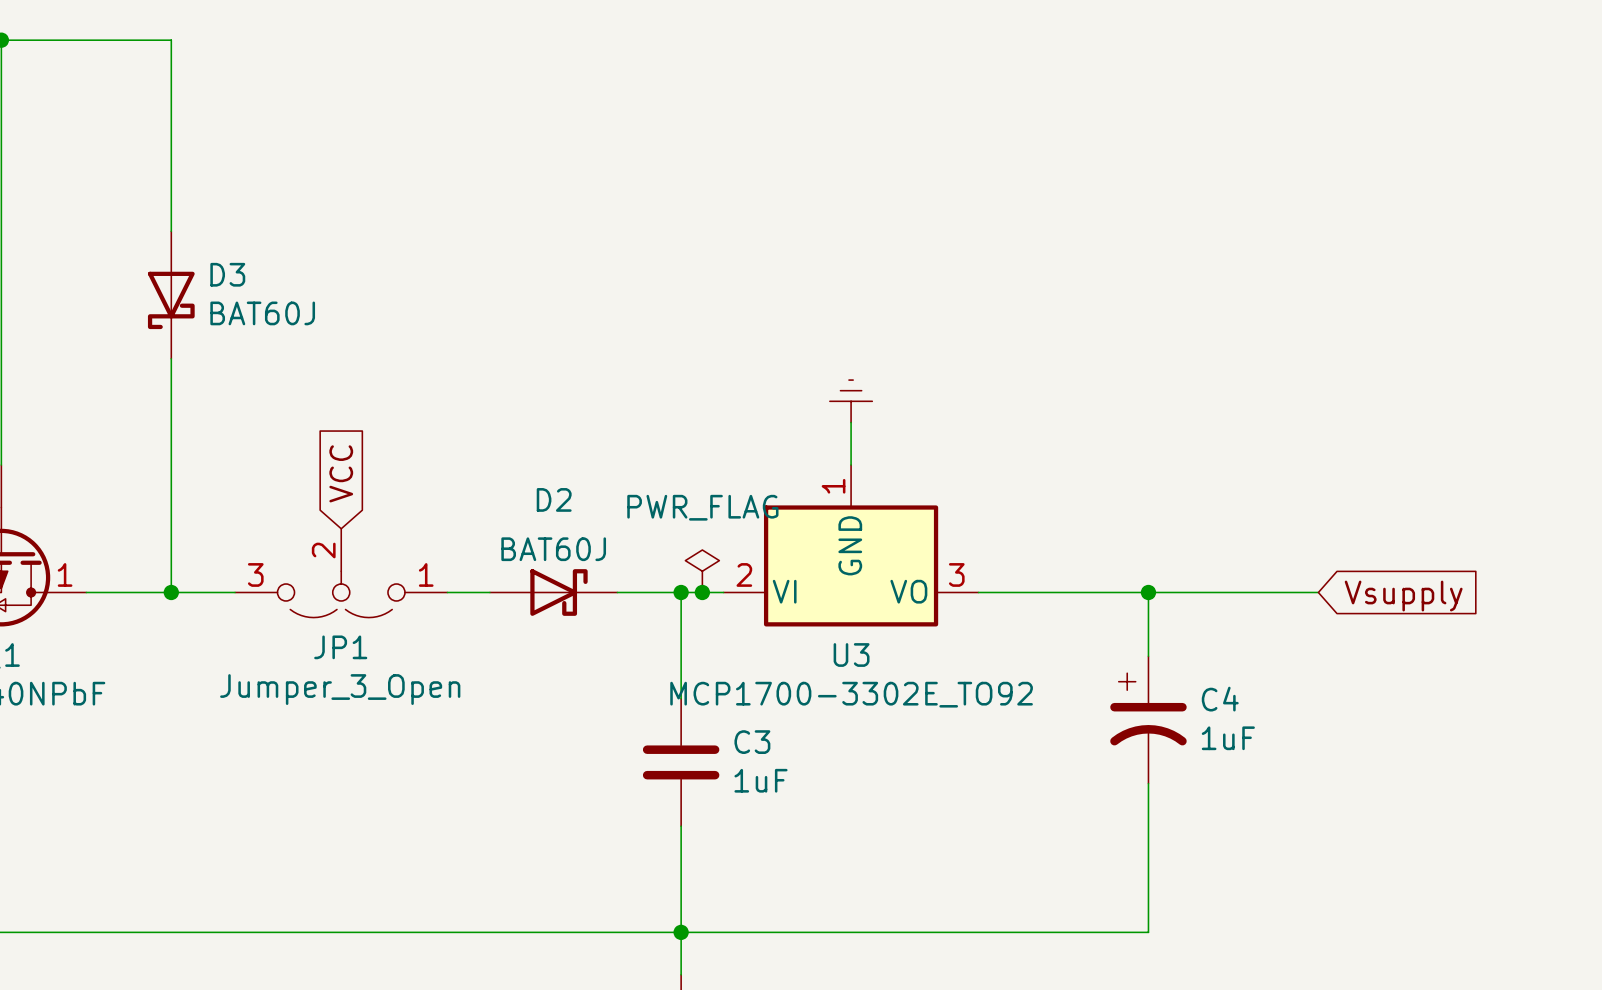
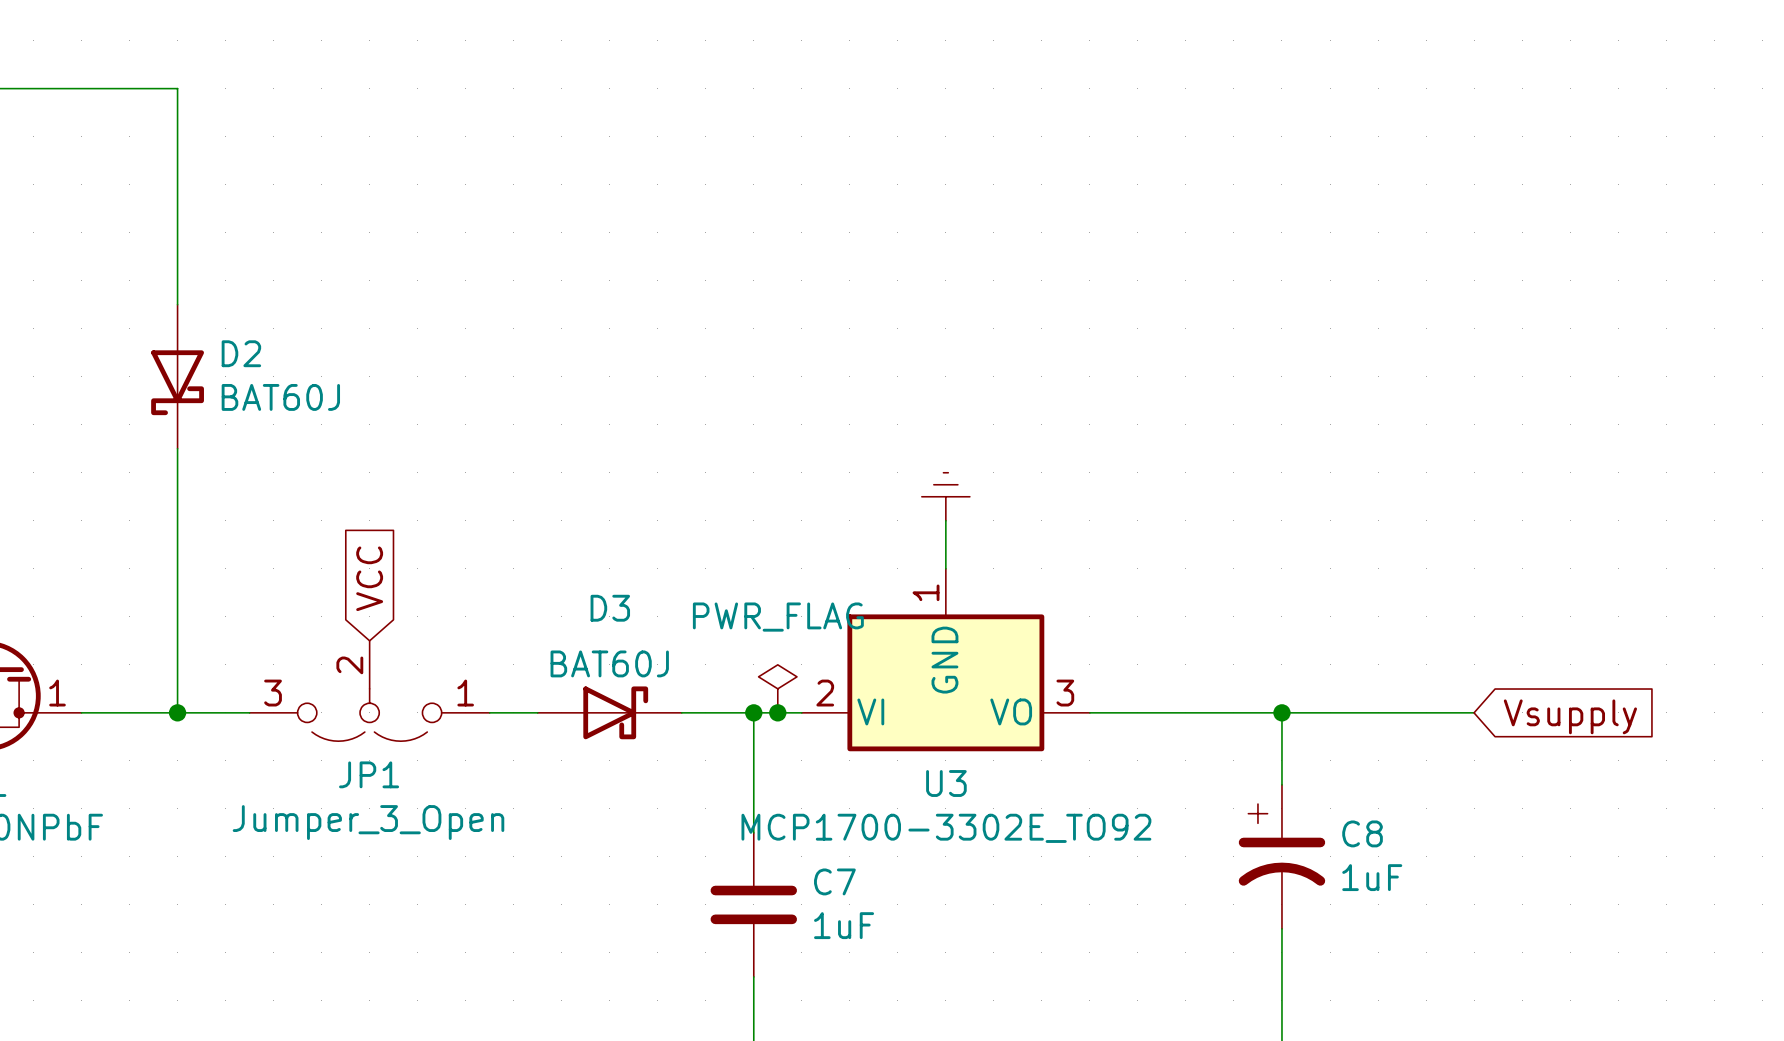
D3 name: D3 (227, 274) -> D2 (241, 353)
D2 name: D2 (554, 499) -> D3 (610, 608)
C4 name: C4 (1220, 699) -> C8 (1362, 833)
C3 name: C3 (752, 742) -> C7 (834, 881)

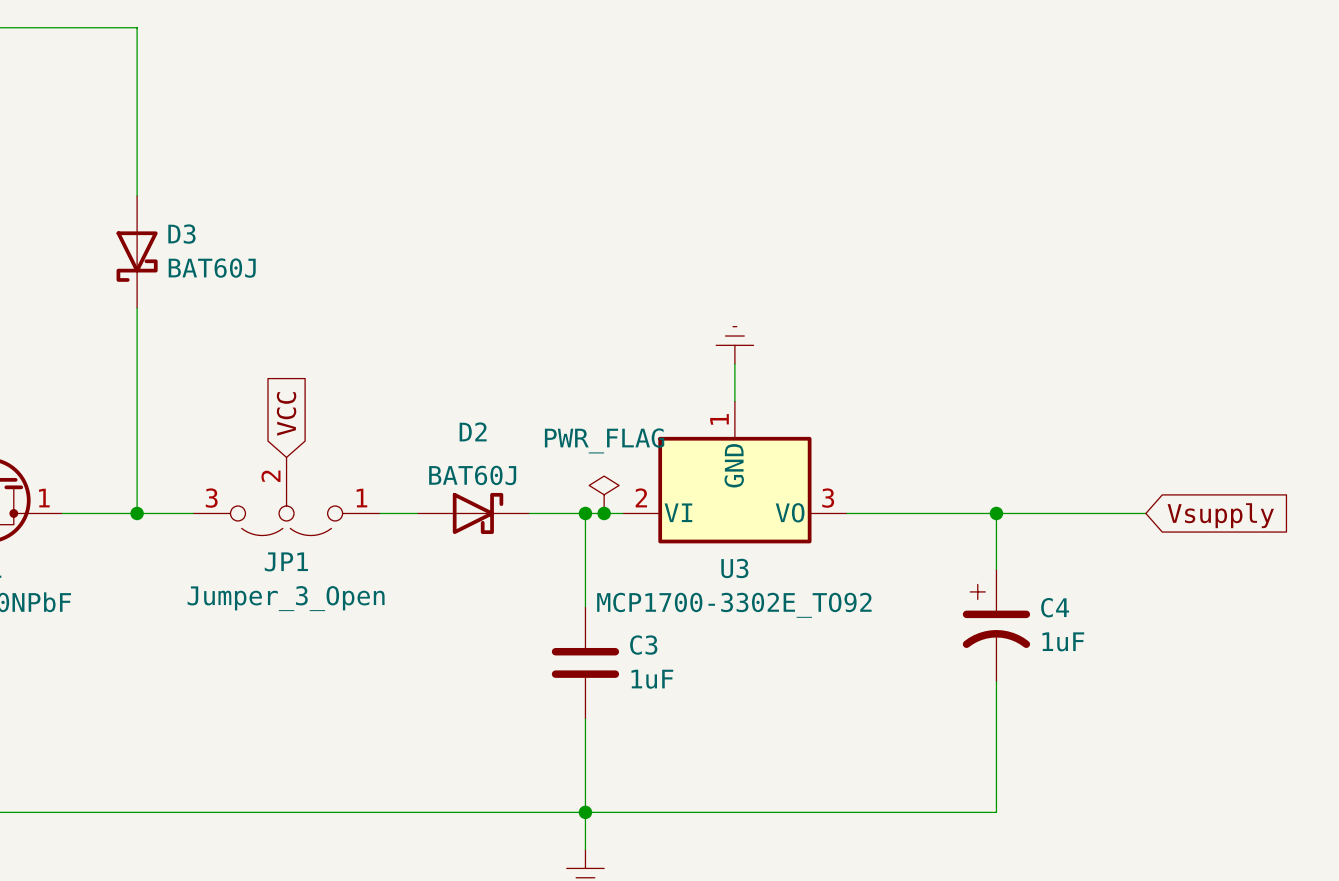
D2 name: D2 (241, 353) -> D3 (181, 234)
D3 name: D3 (610, 608) -> D2 (473, 431)
C8 name: C8 (1362, 833) -> C4 (1055, 607)
C7 name: C7 (834, 881) -> C3 (643, 645)

